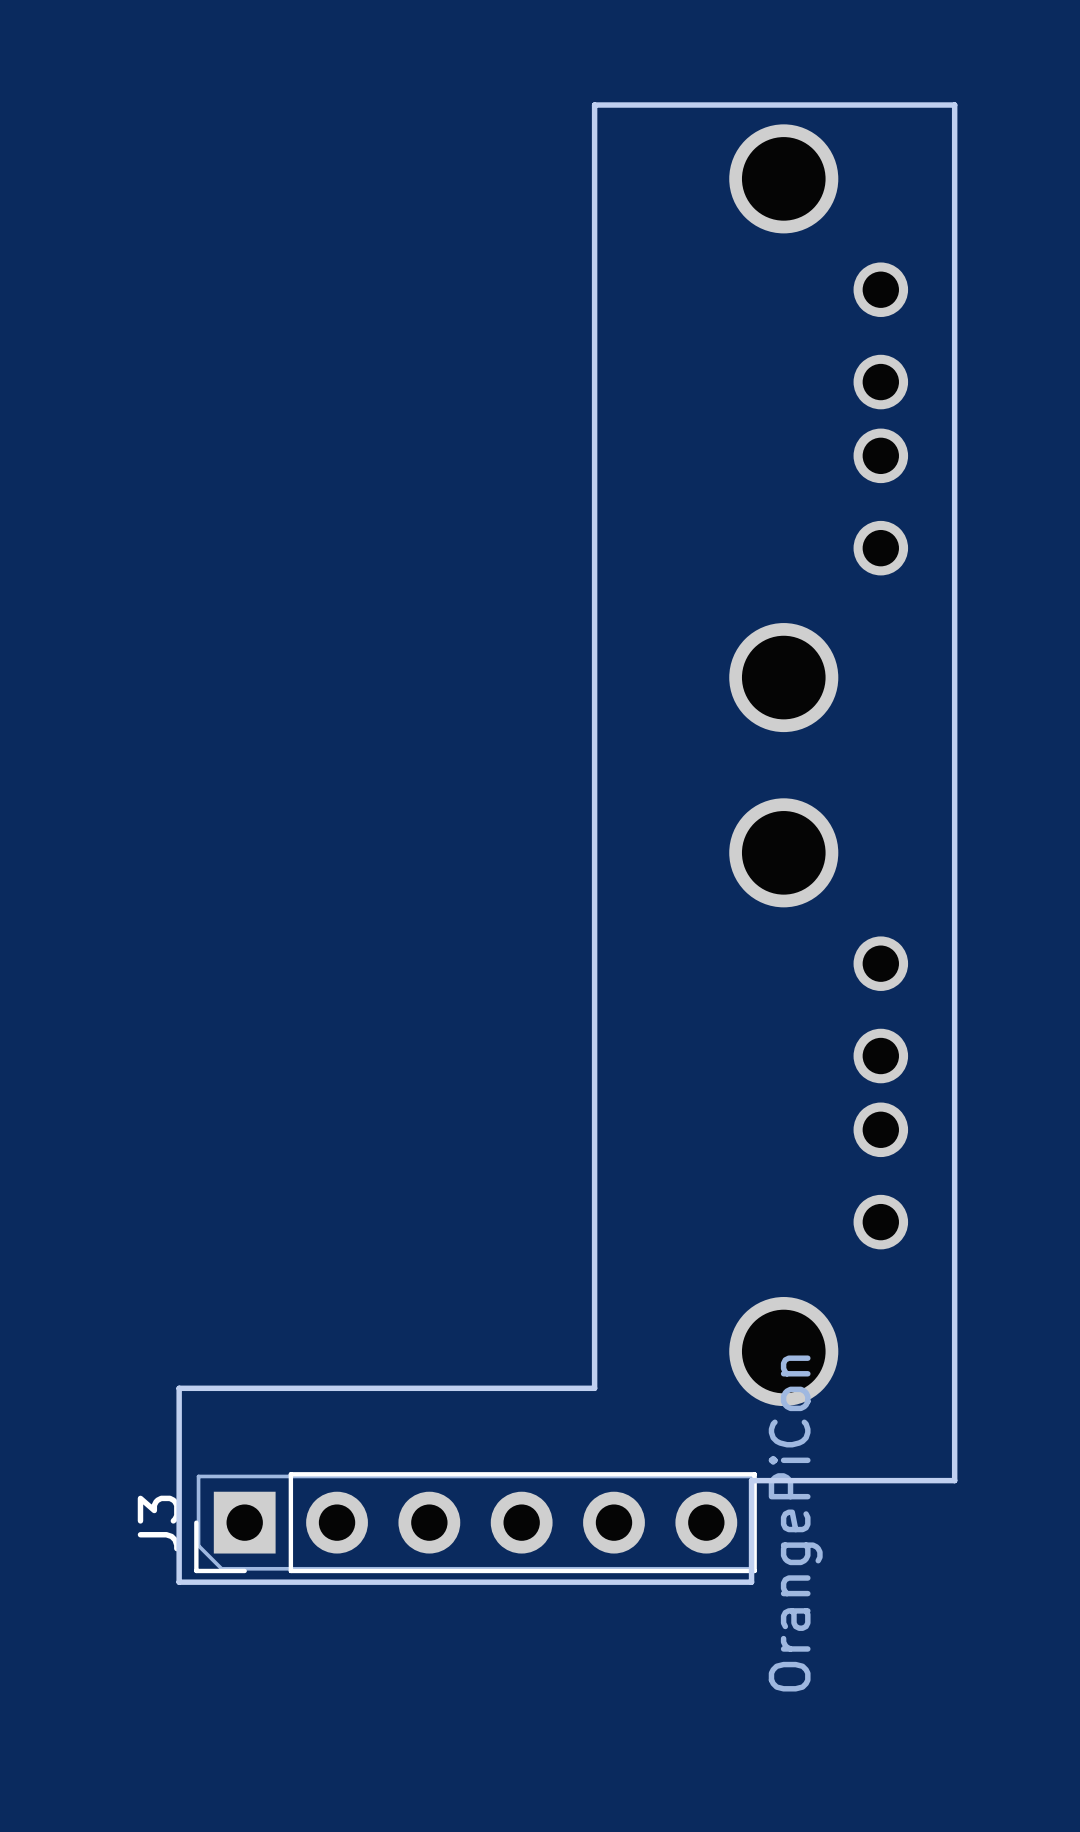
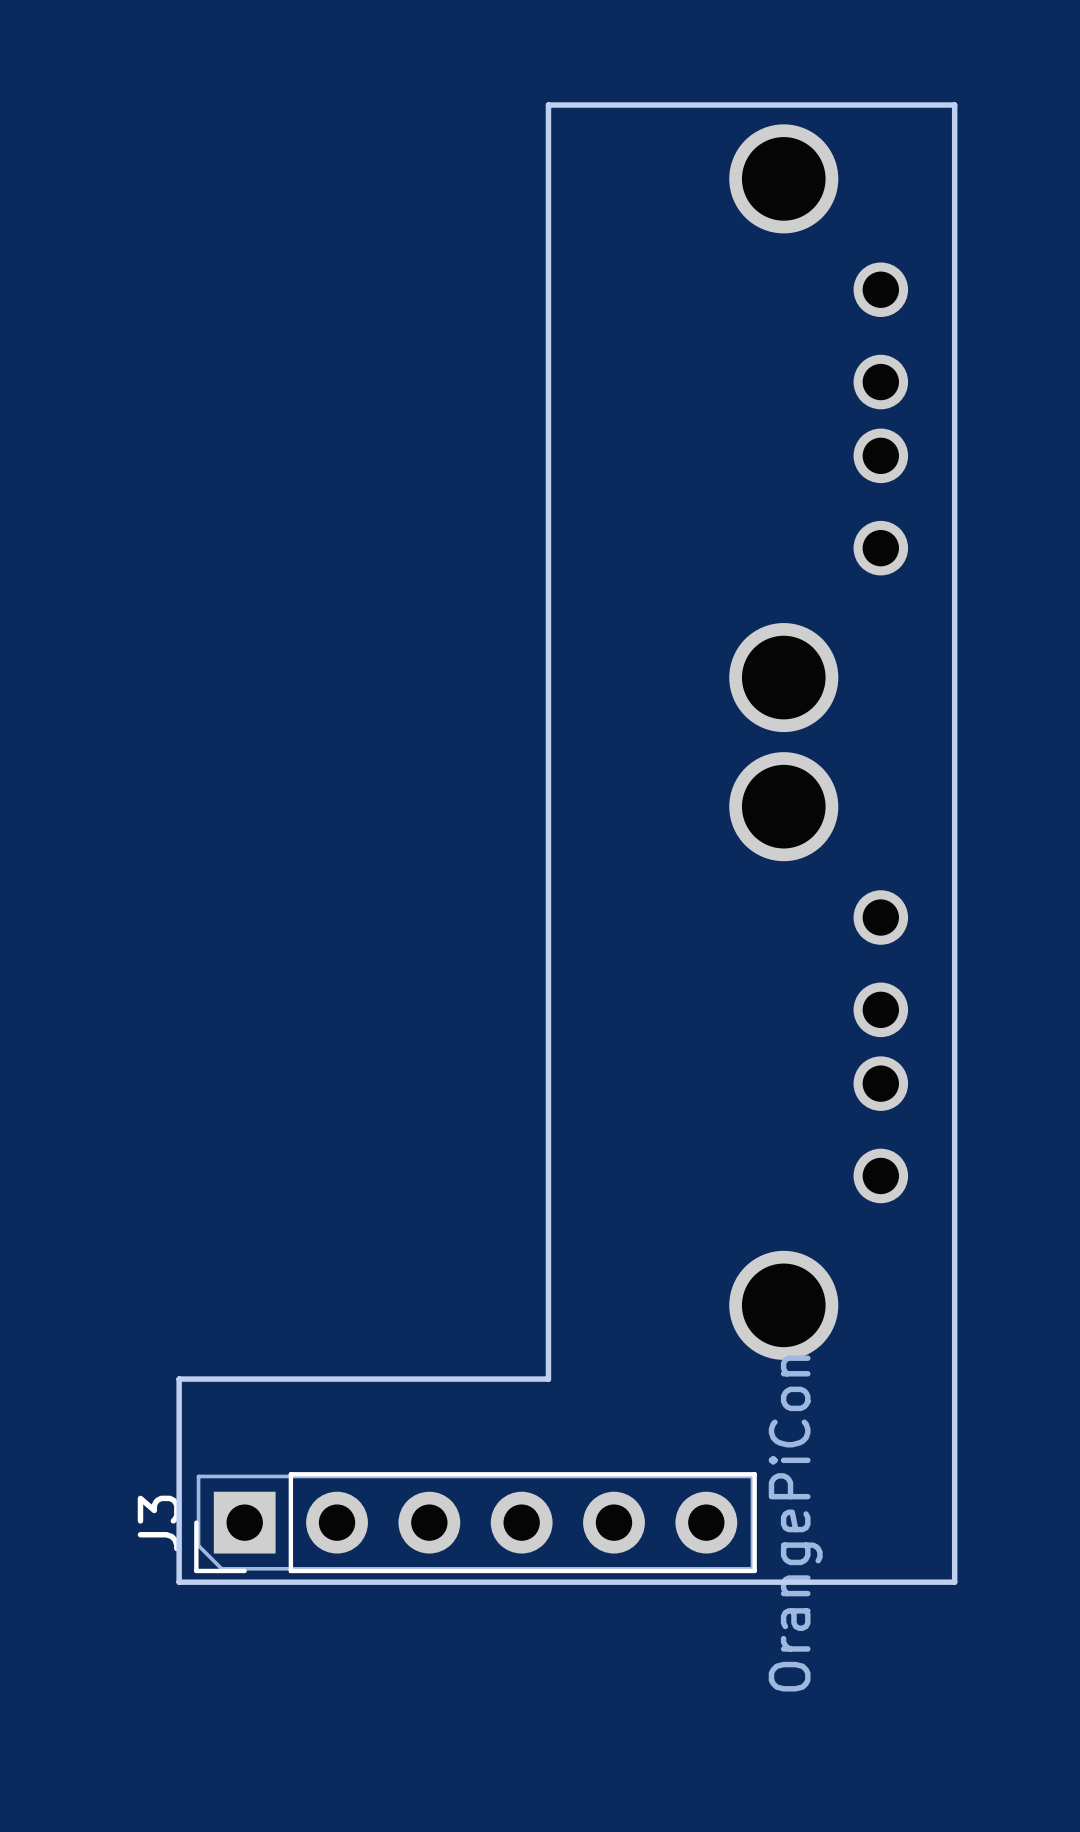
board edge: (594, 105) (594, 1388) (179, 1388) -> (594, 105) (548, 105) (548, 1379) (179, 1379) (179, 1388)
part position: (818, 1102) -> (818, 1056)
board edge: (954, 1480) (751, 1480) (751, 1582) -> (954, 1480) (954, 1582) (751, 1582)

